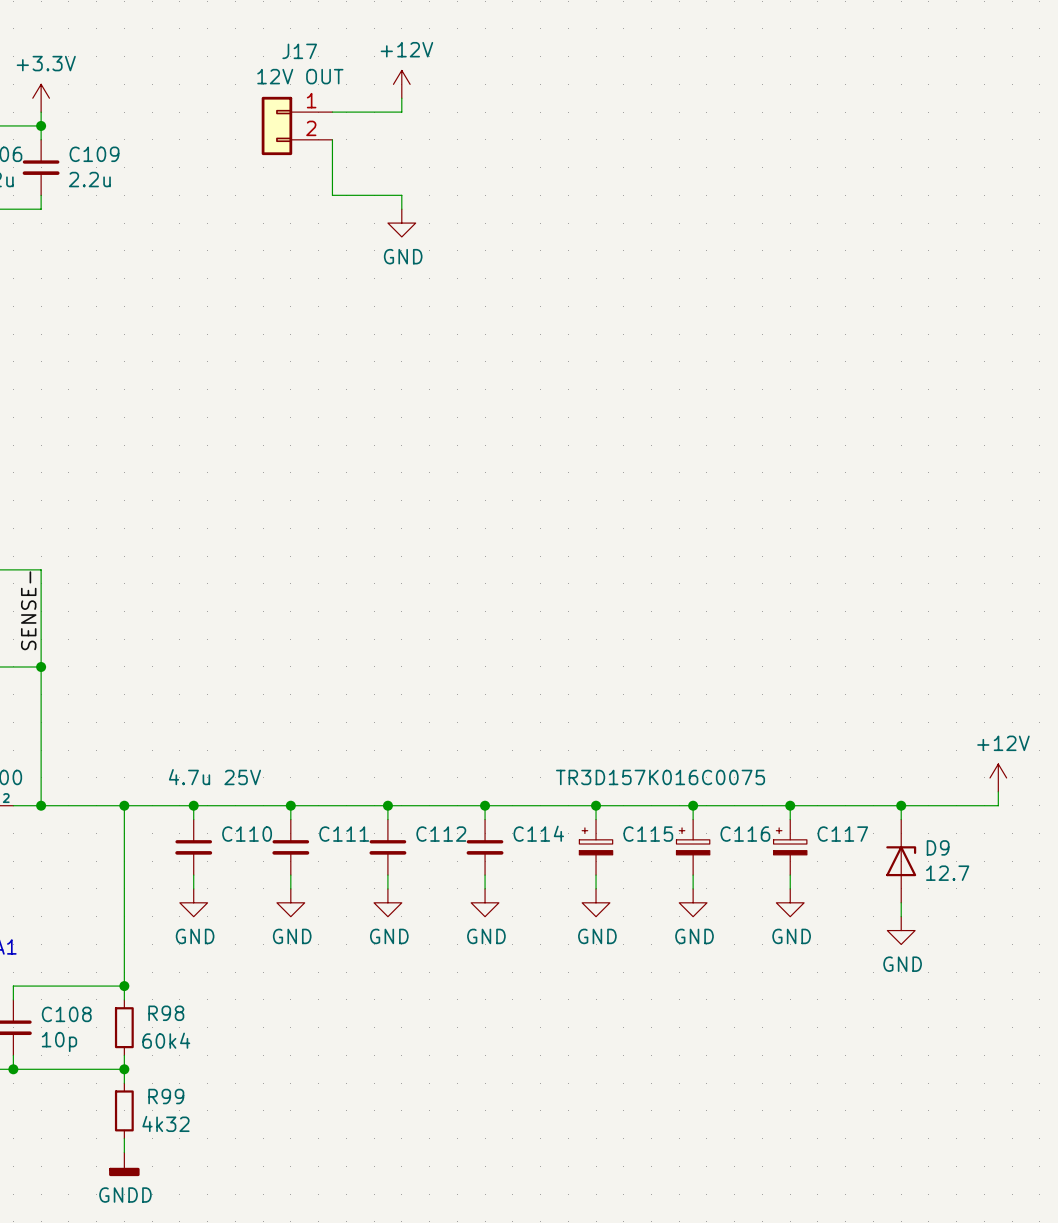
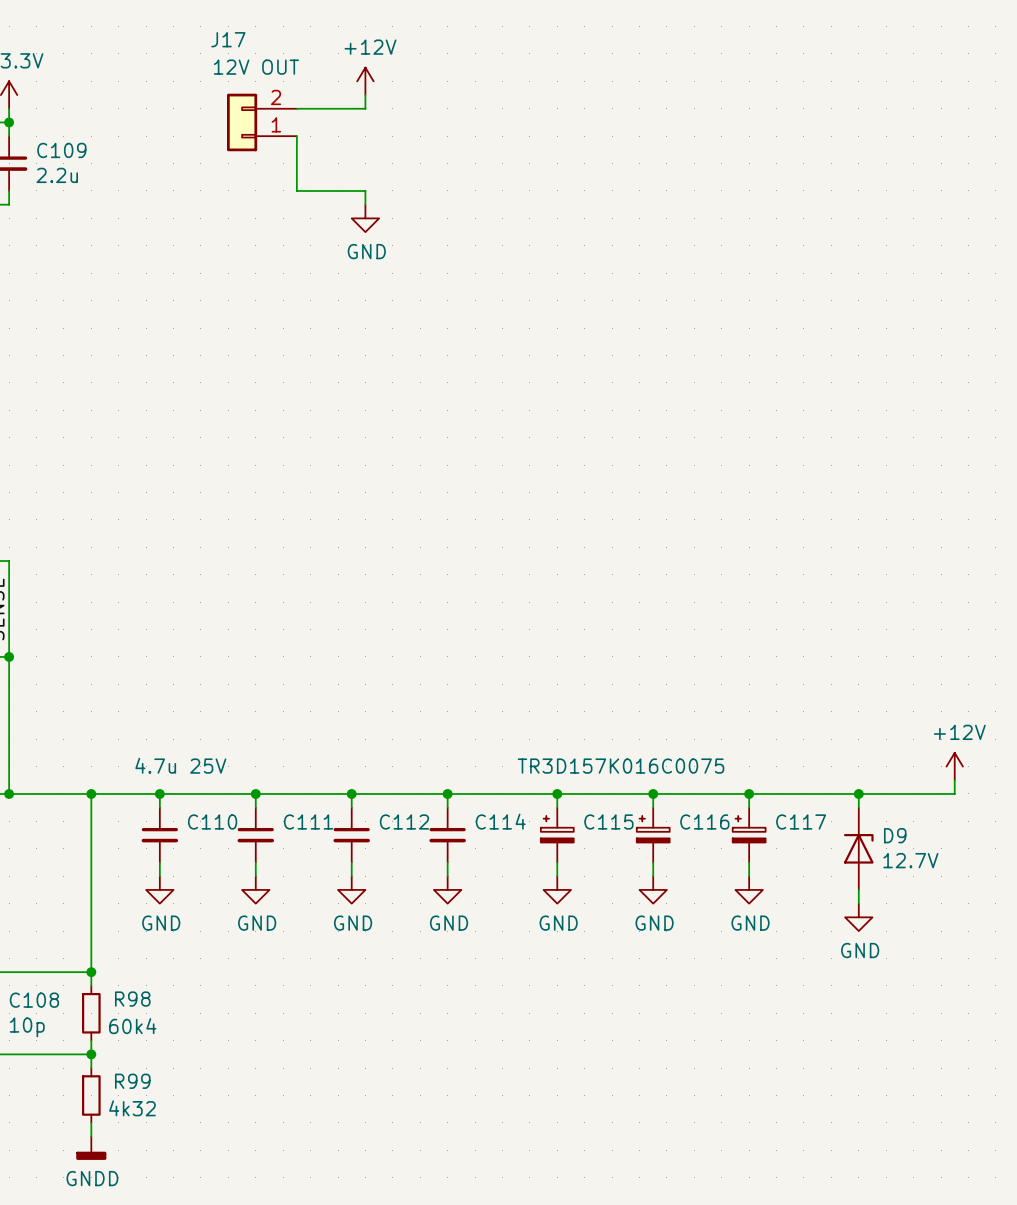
J17 name position: J17 (299, 51) -> J17 (228, 39)
J17 flip: as is (276, 125) -> up-down (242, 122)
D9 value: 12.7 (947, 873) -> 12.7V (910, 860)

